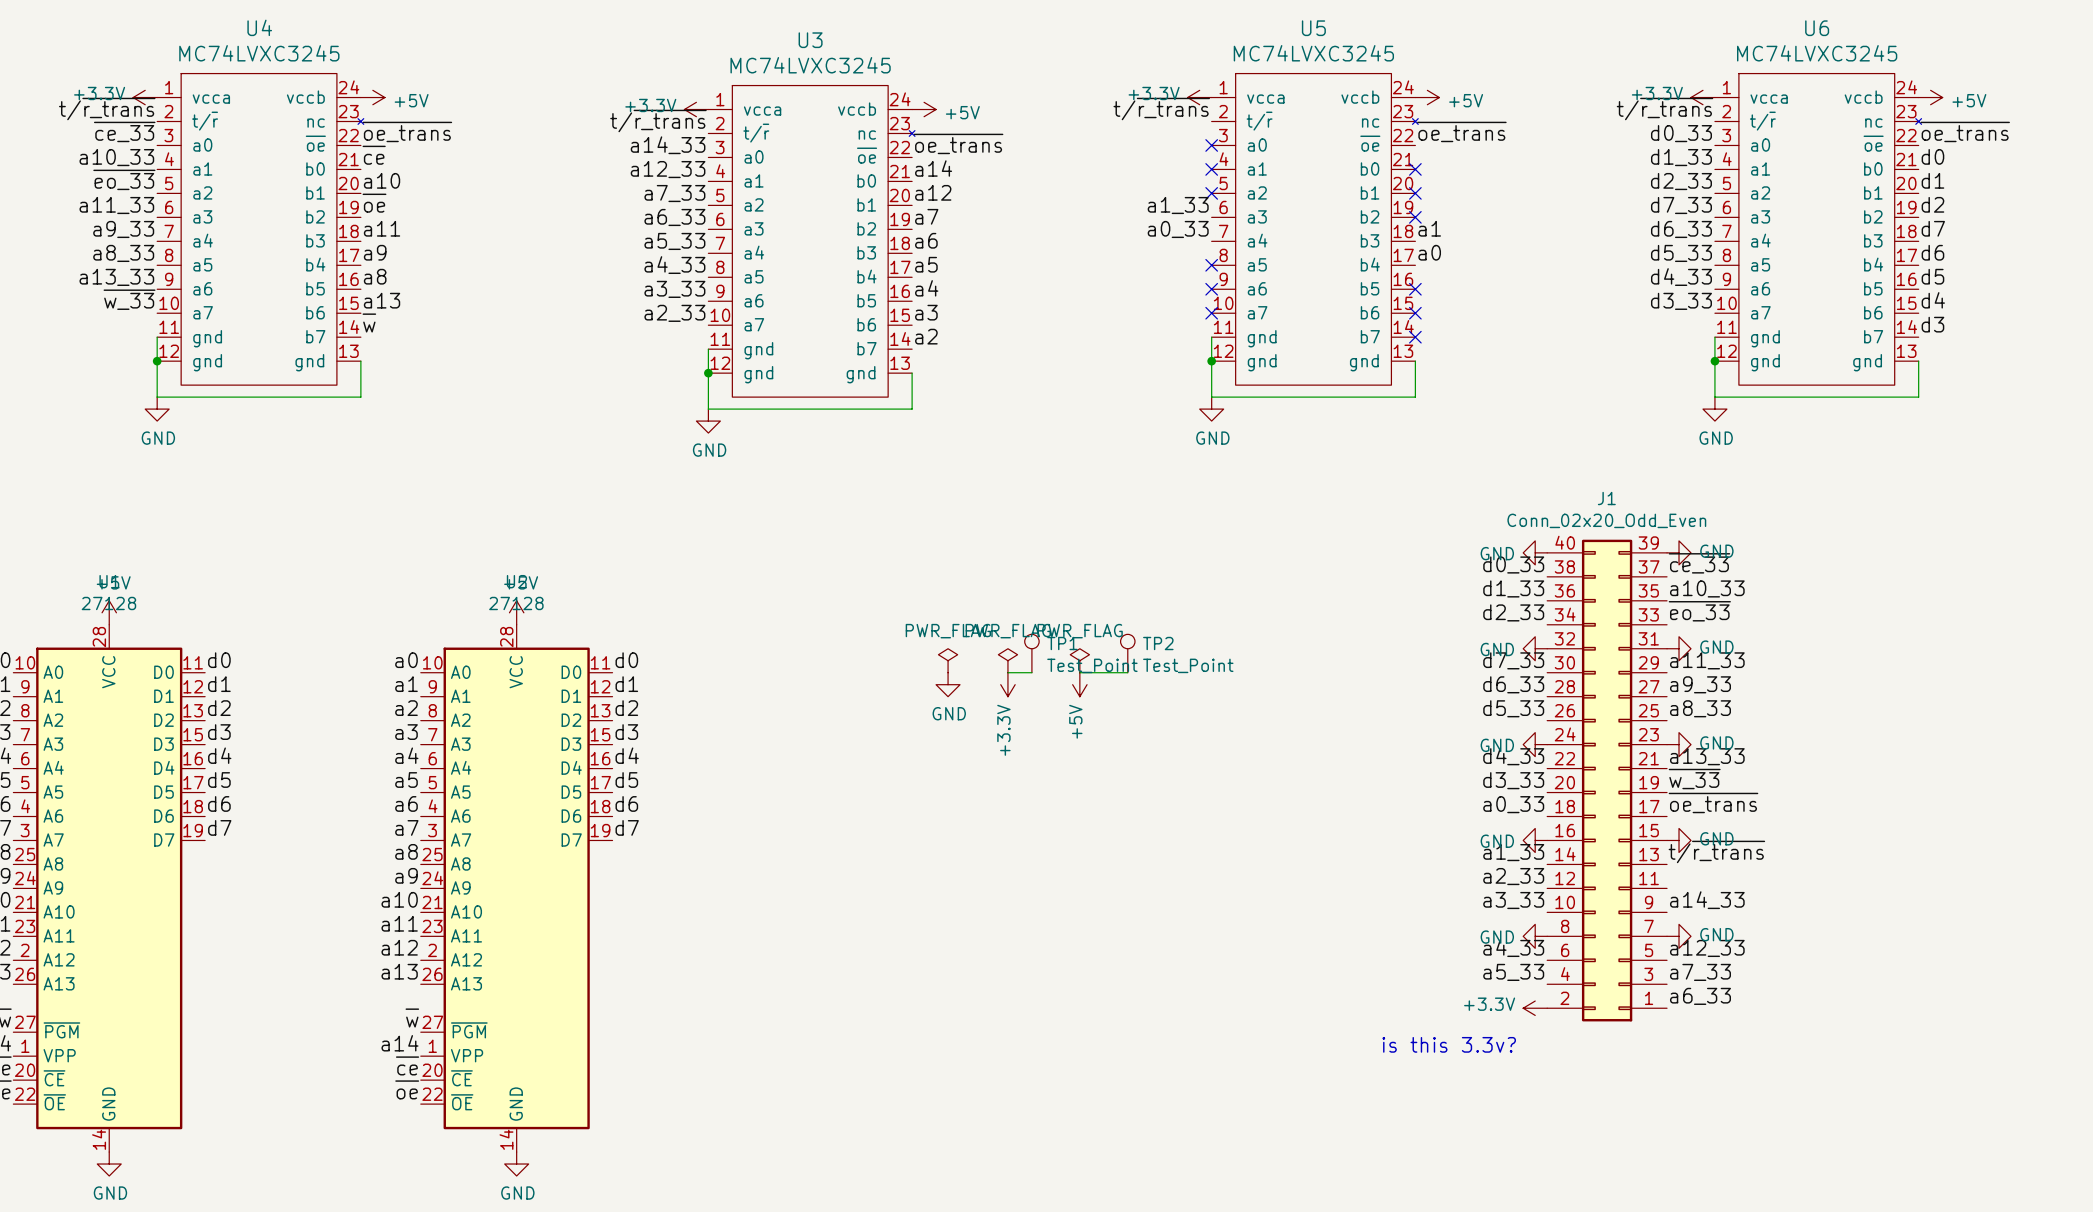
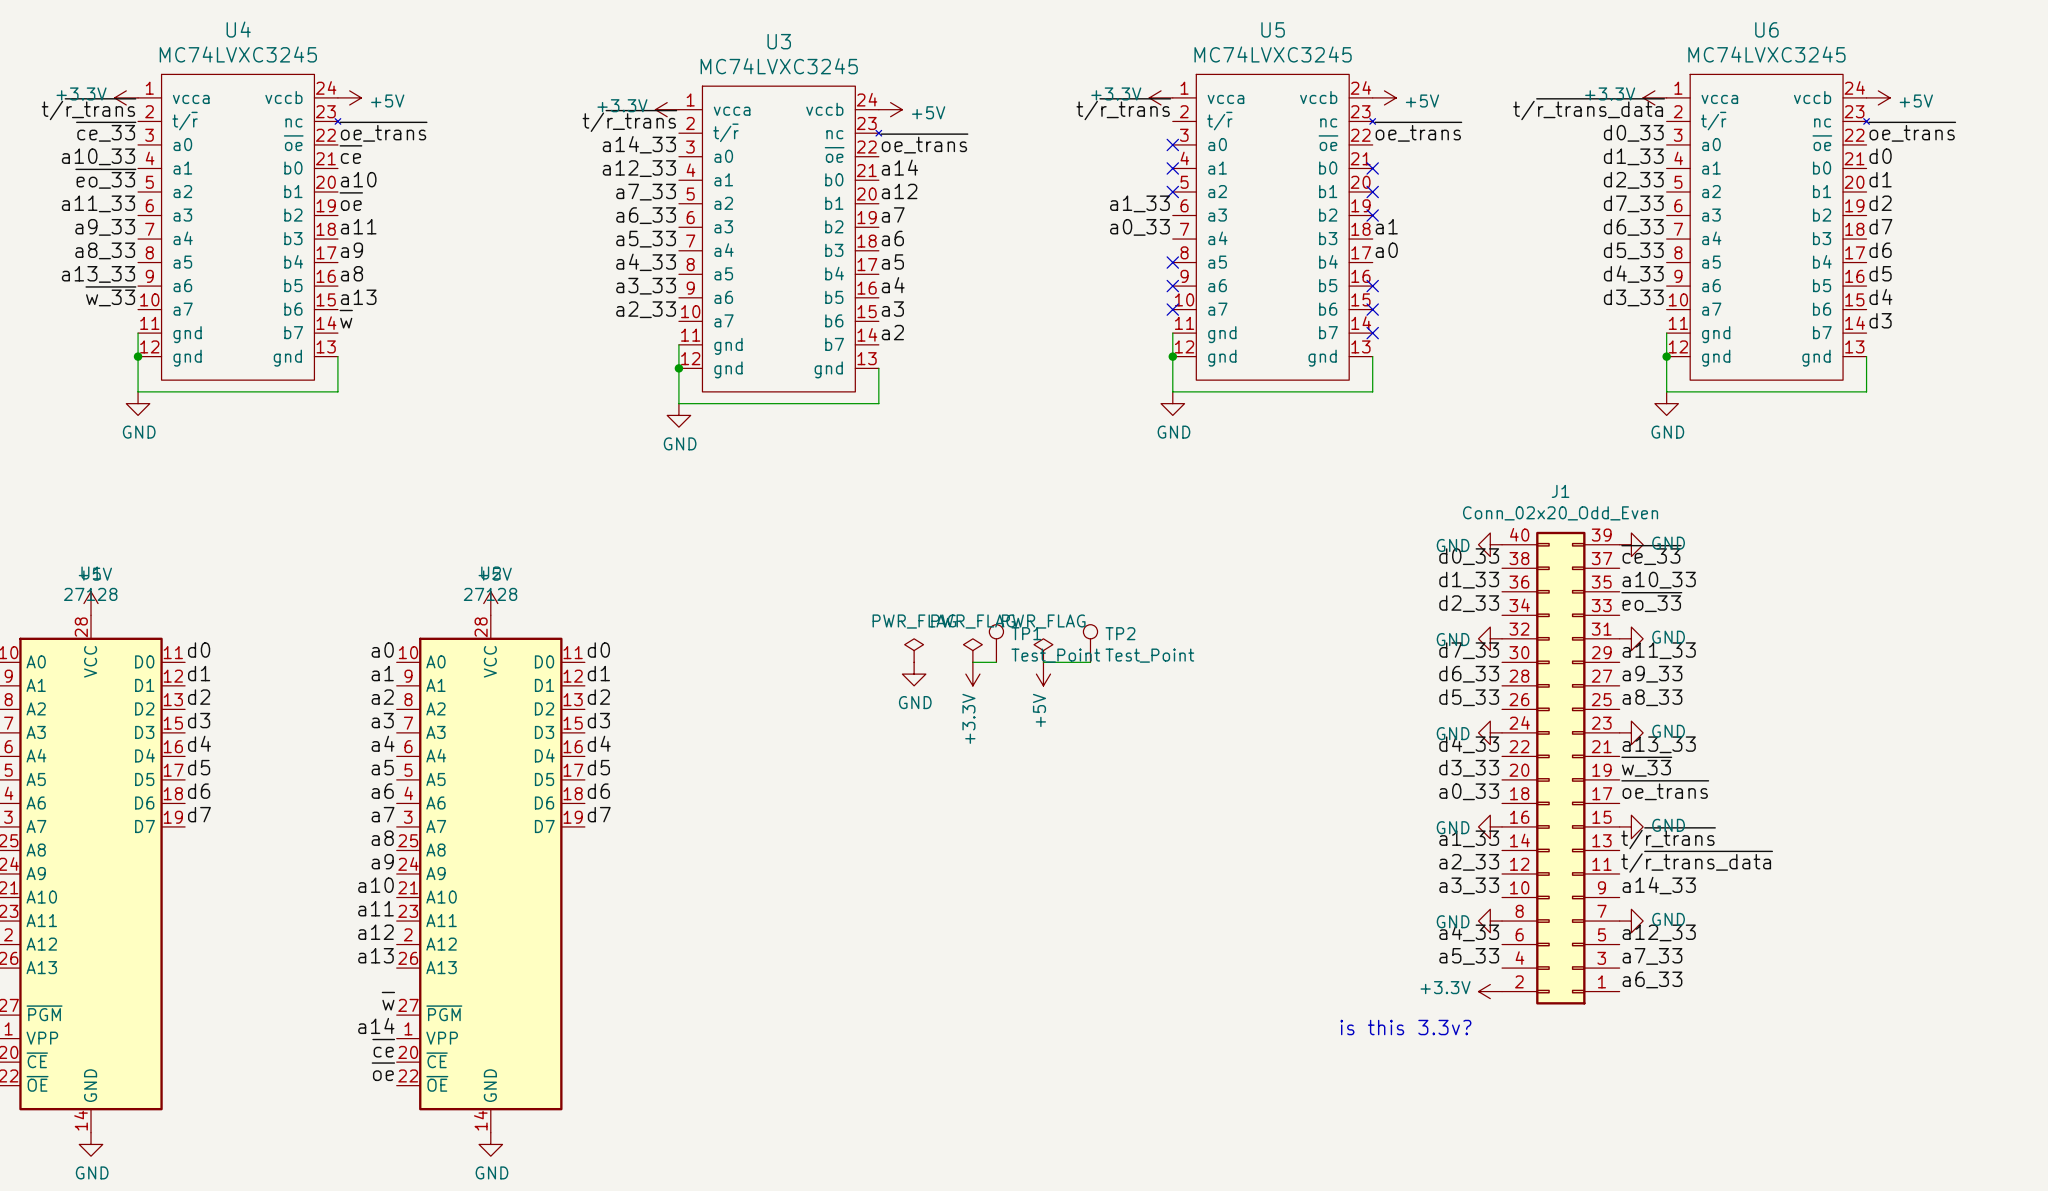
label: t/~{r_trans} (1665, 109) -> t/~{r_trans_data} (1589, 109)
label: none -> t/~{r_trans_data} (1697, 861)

